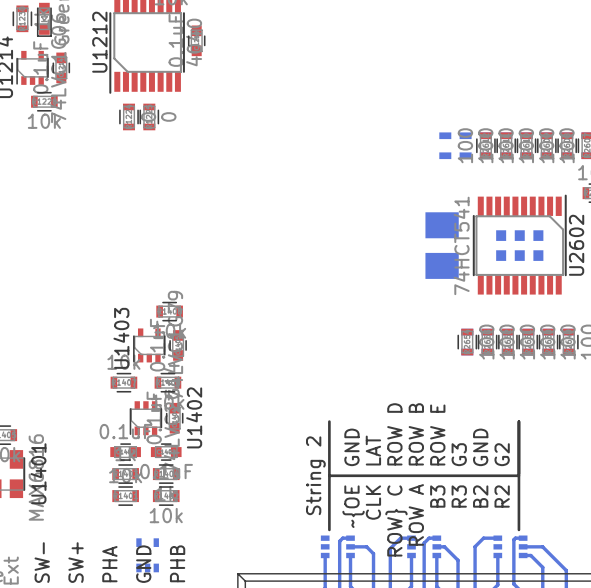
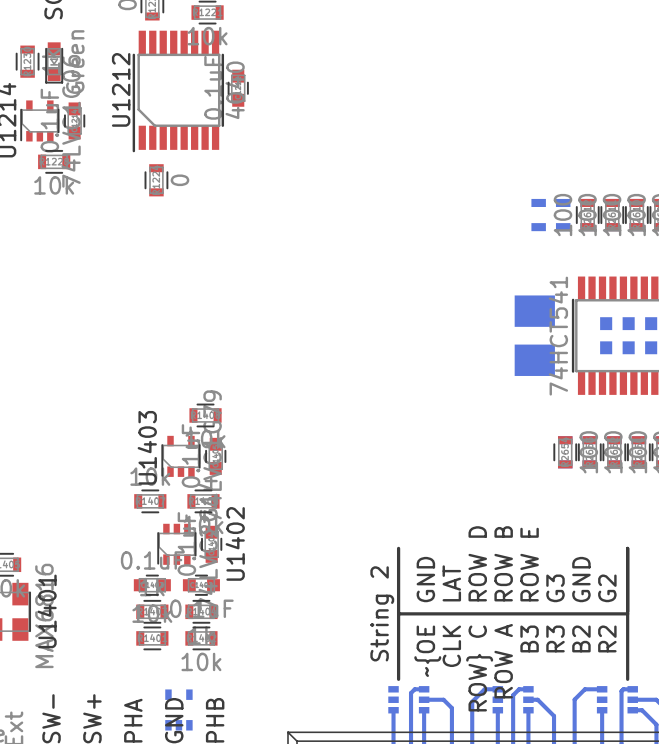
part: 0 (149, 116) -> none

